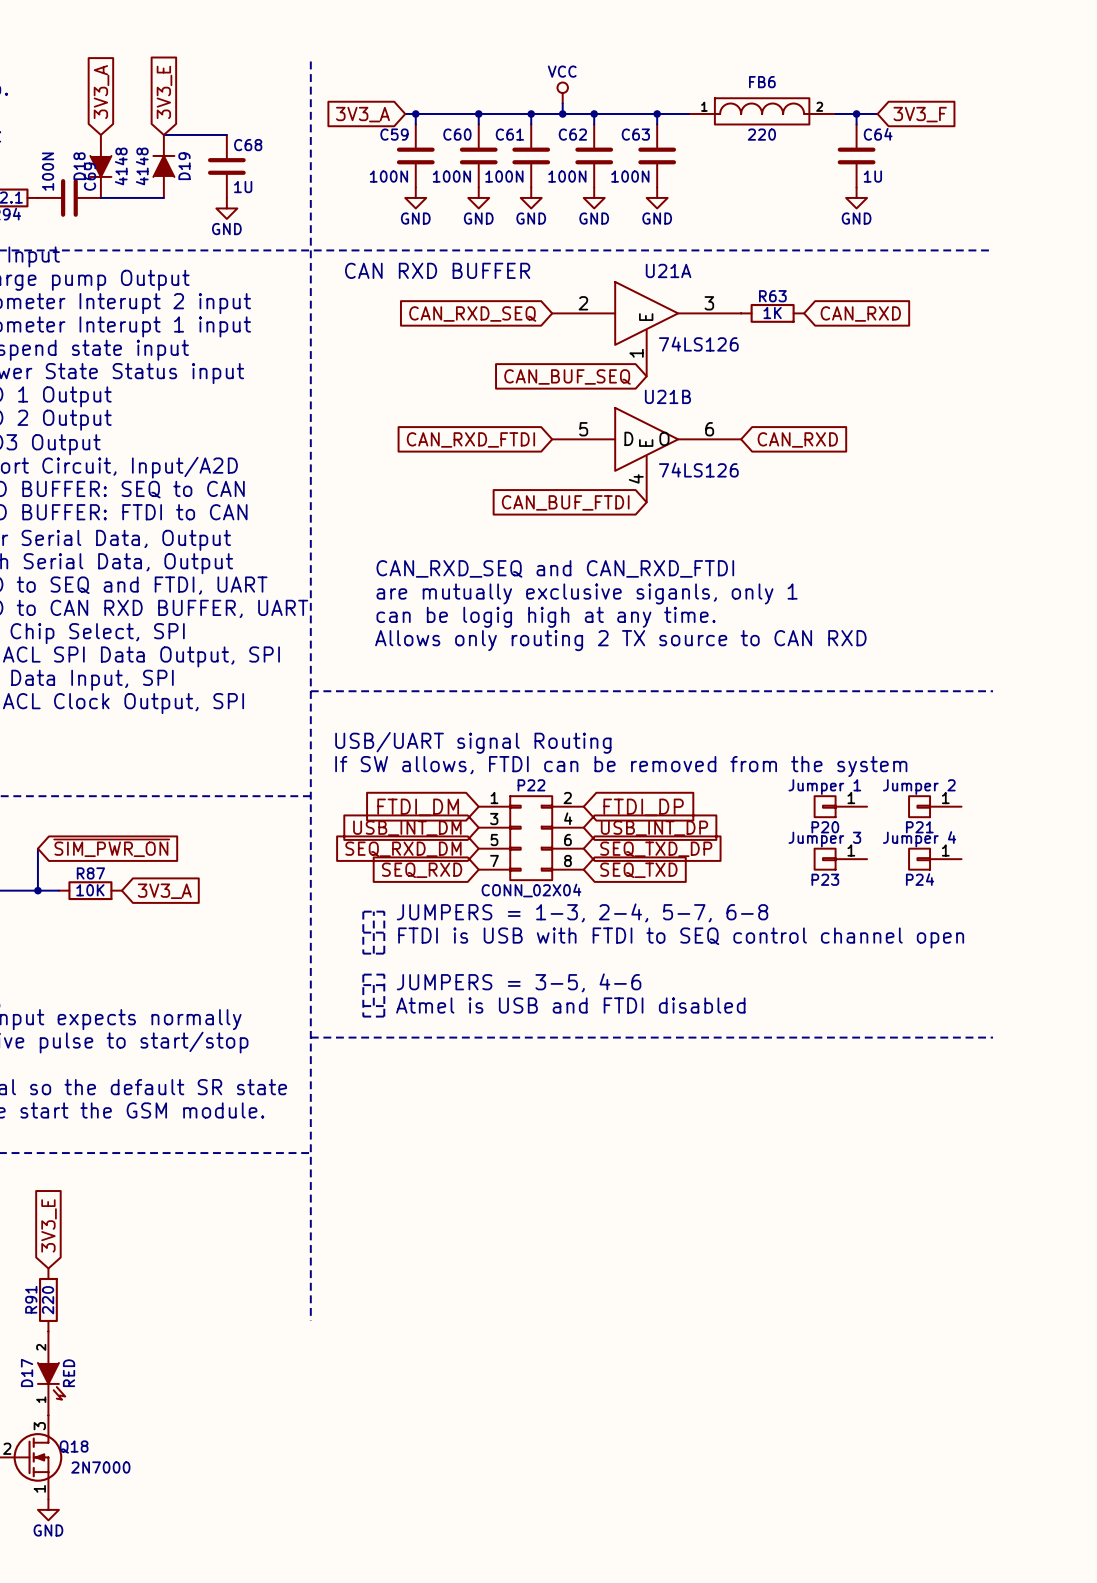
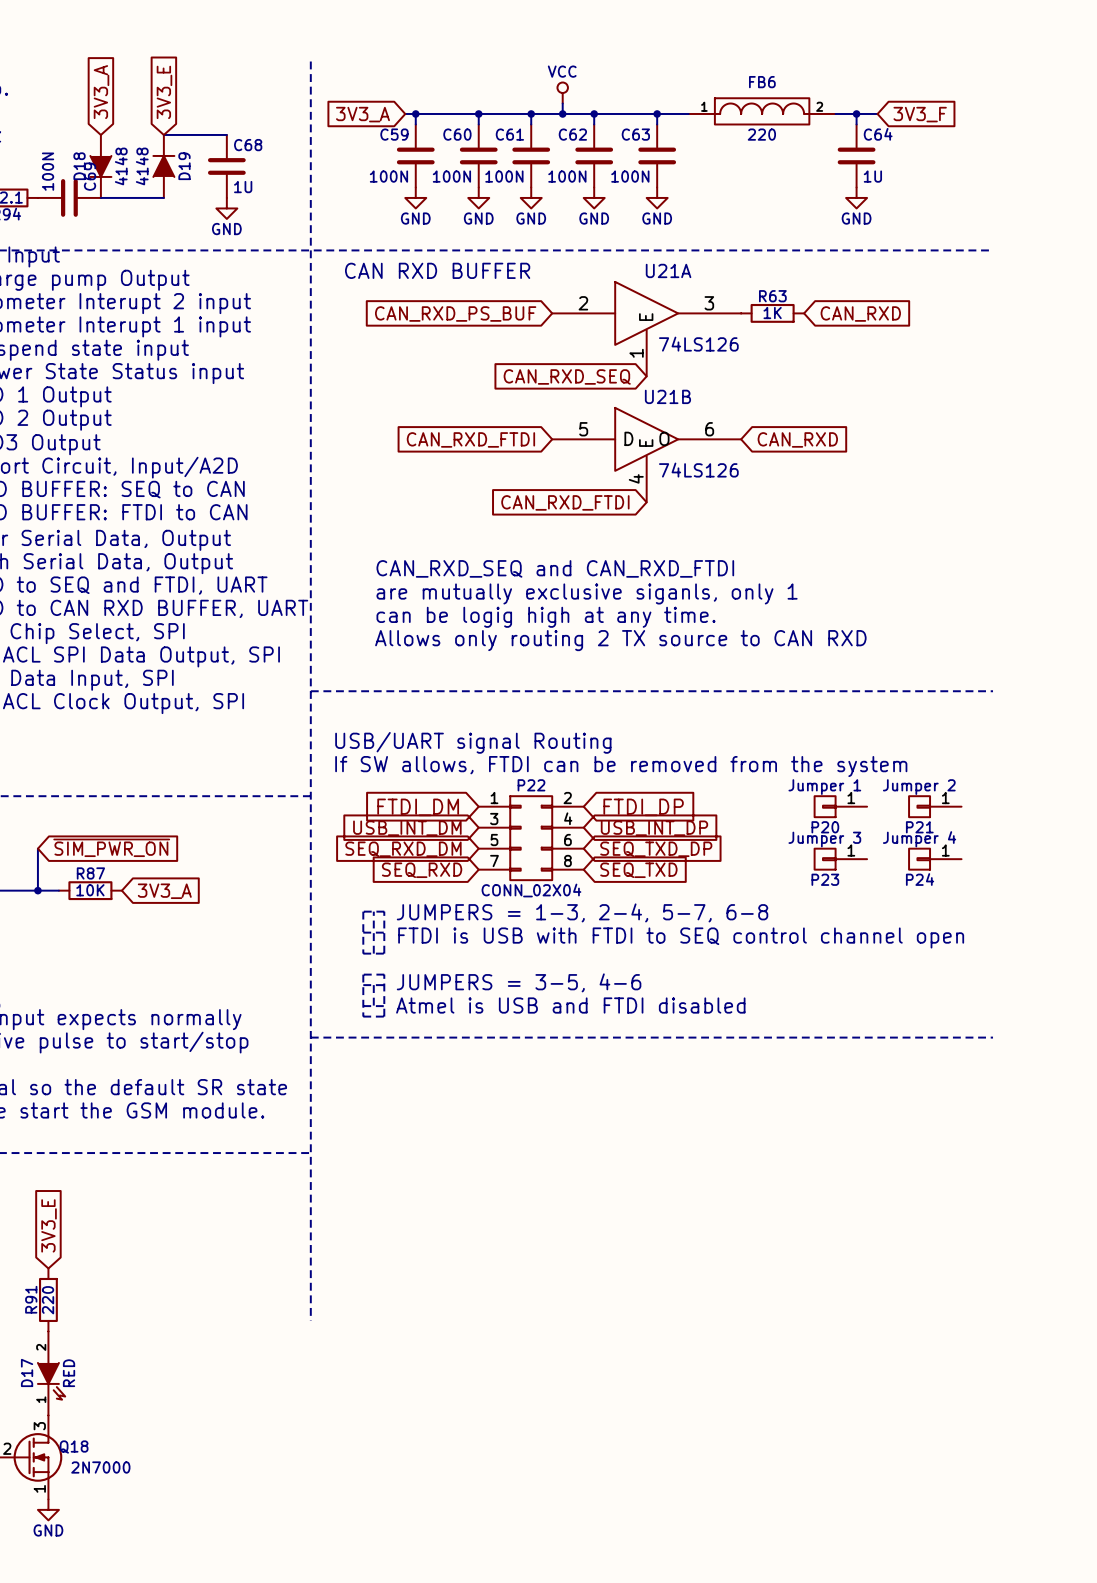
global label: CAN_RXD_SEQ (472, 314) -> CAN_RXD_PS_BUF (455, 314)
global label: CAN_BUF_SEQ (567, 376) -> CAN_RXD_SEQ (567, 376)
global label: CAN_BUF_FTDI (565, 502) -> CAN_RXD_FTDI (565, 502)

